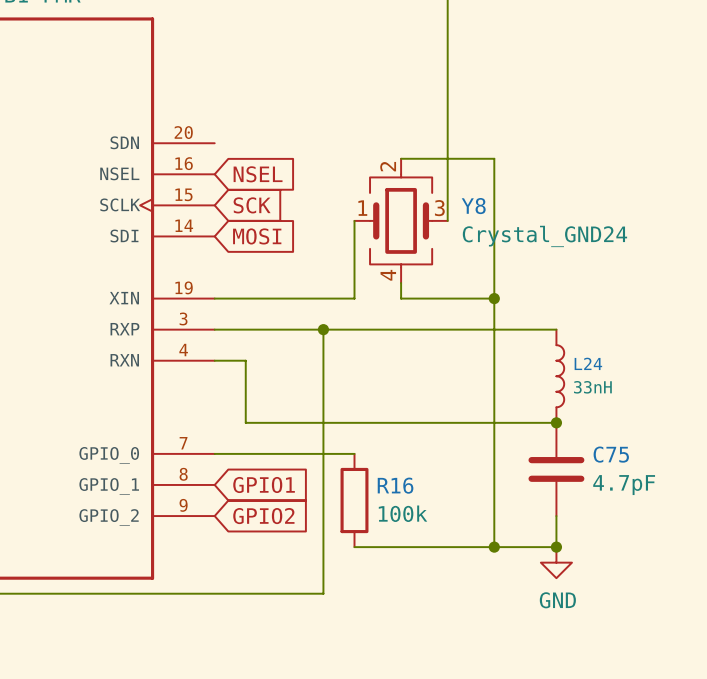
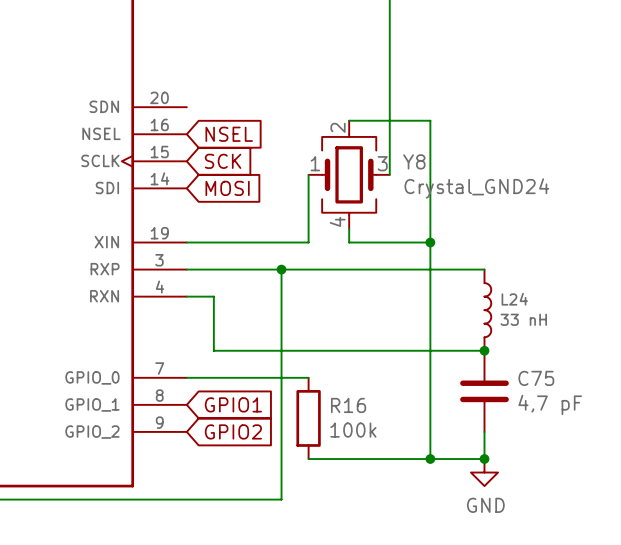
L24 value: 33nH (592, 387) -> 33 nH (523, 319)
C75 value: 4.7pF (624, 485) -> 4,7 pF (550, 404)

